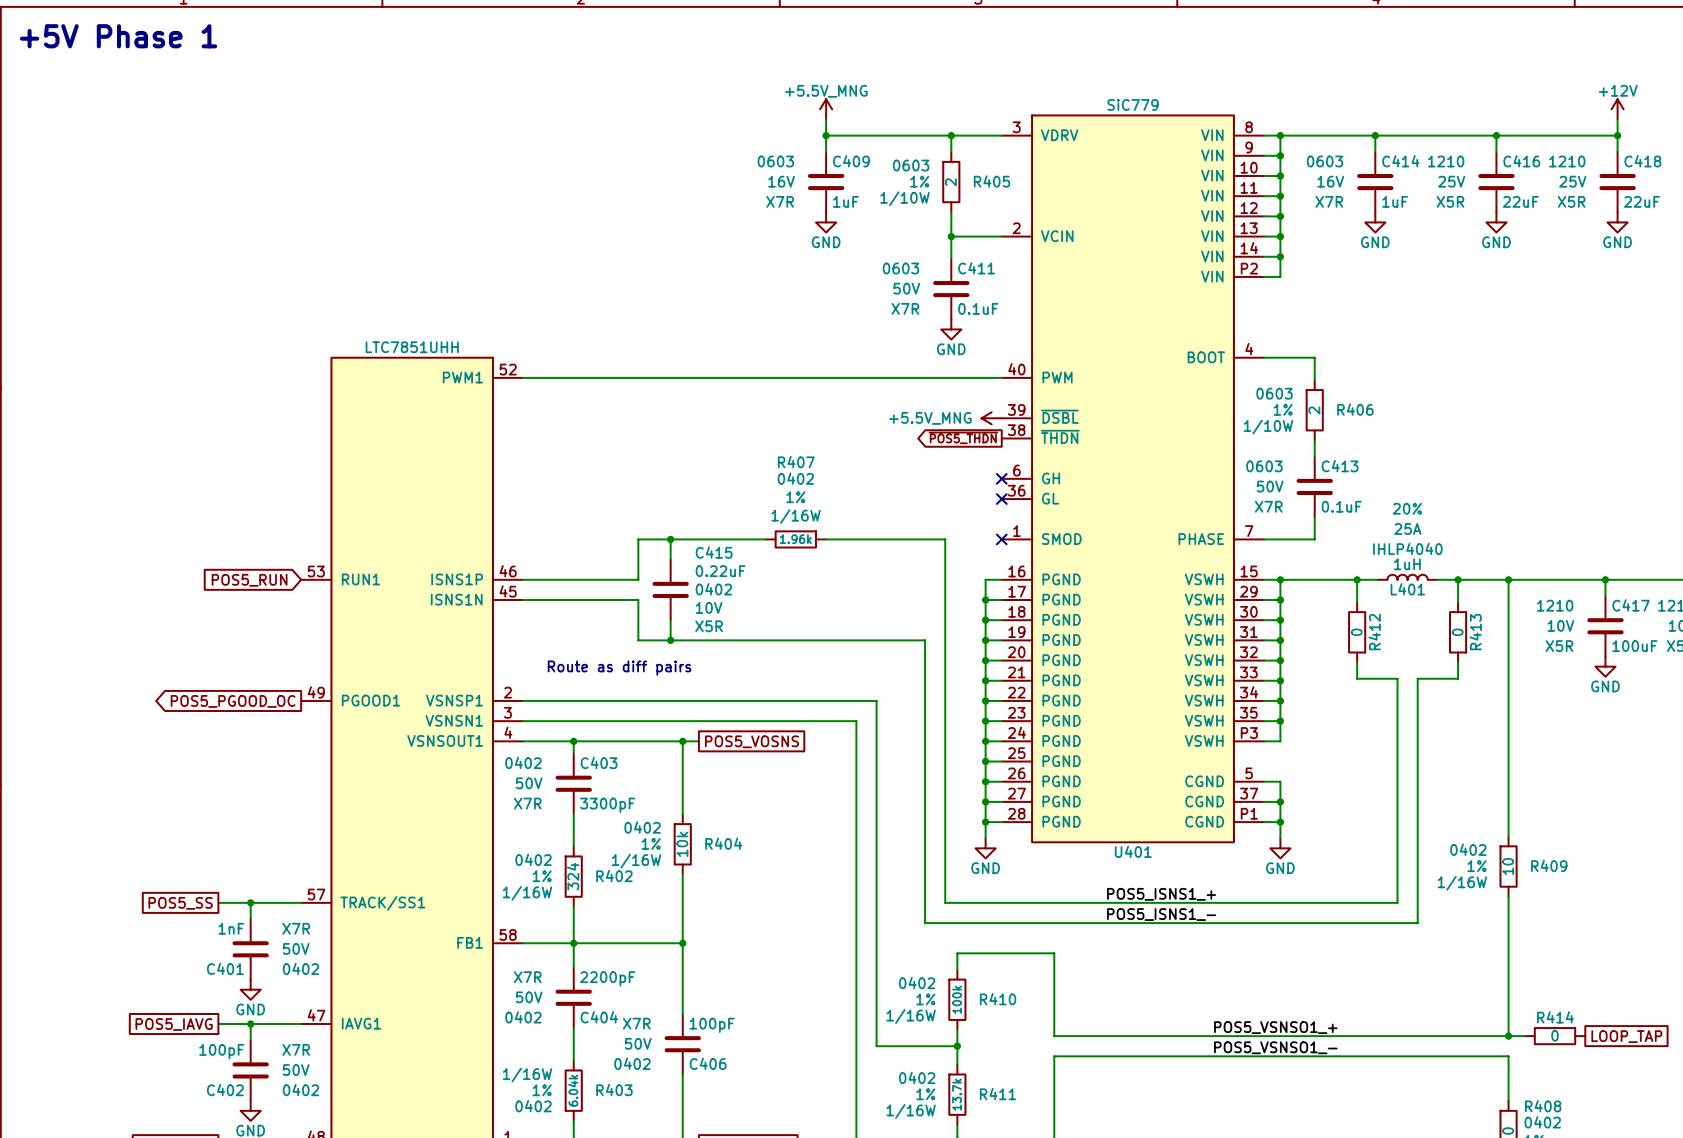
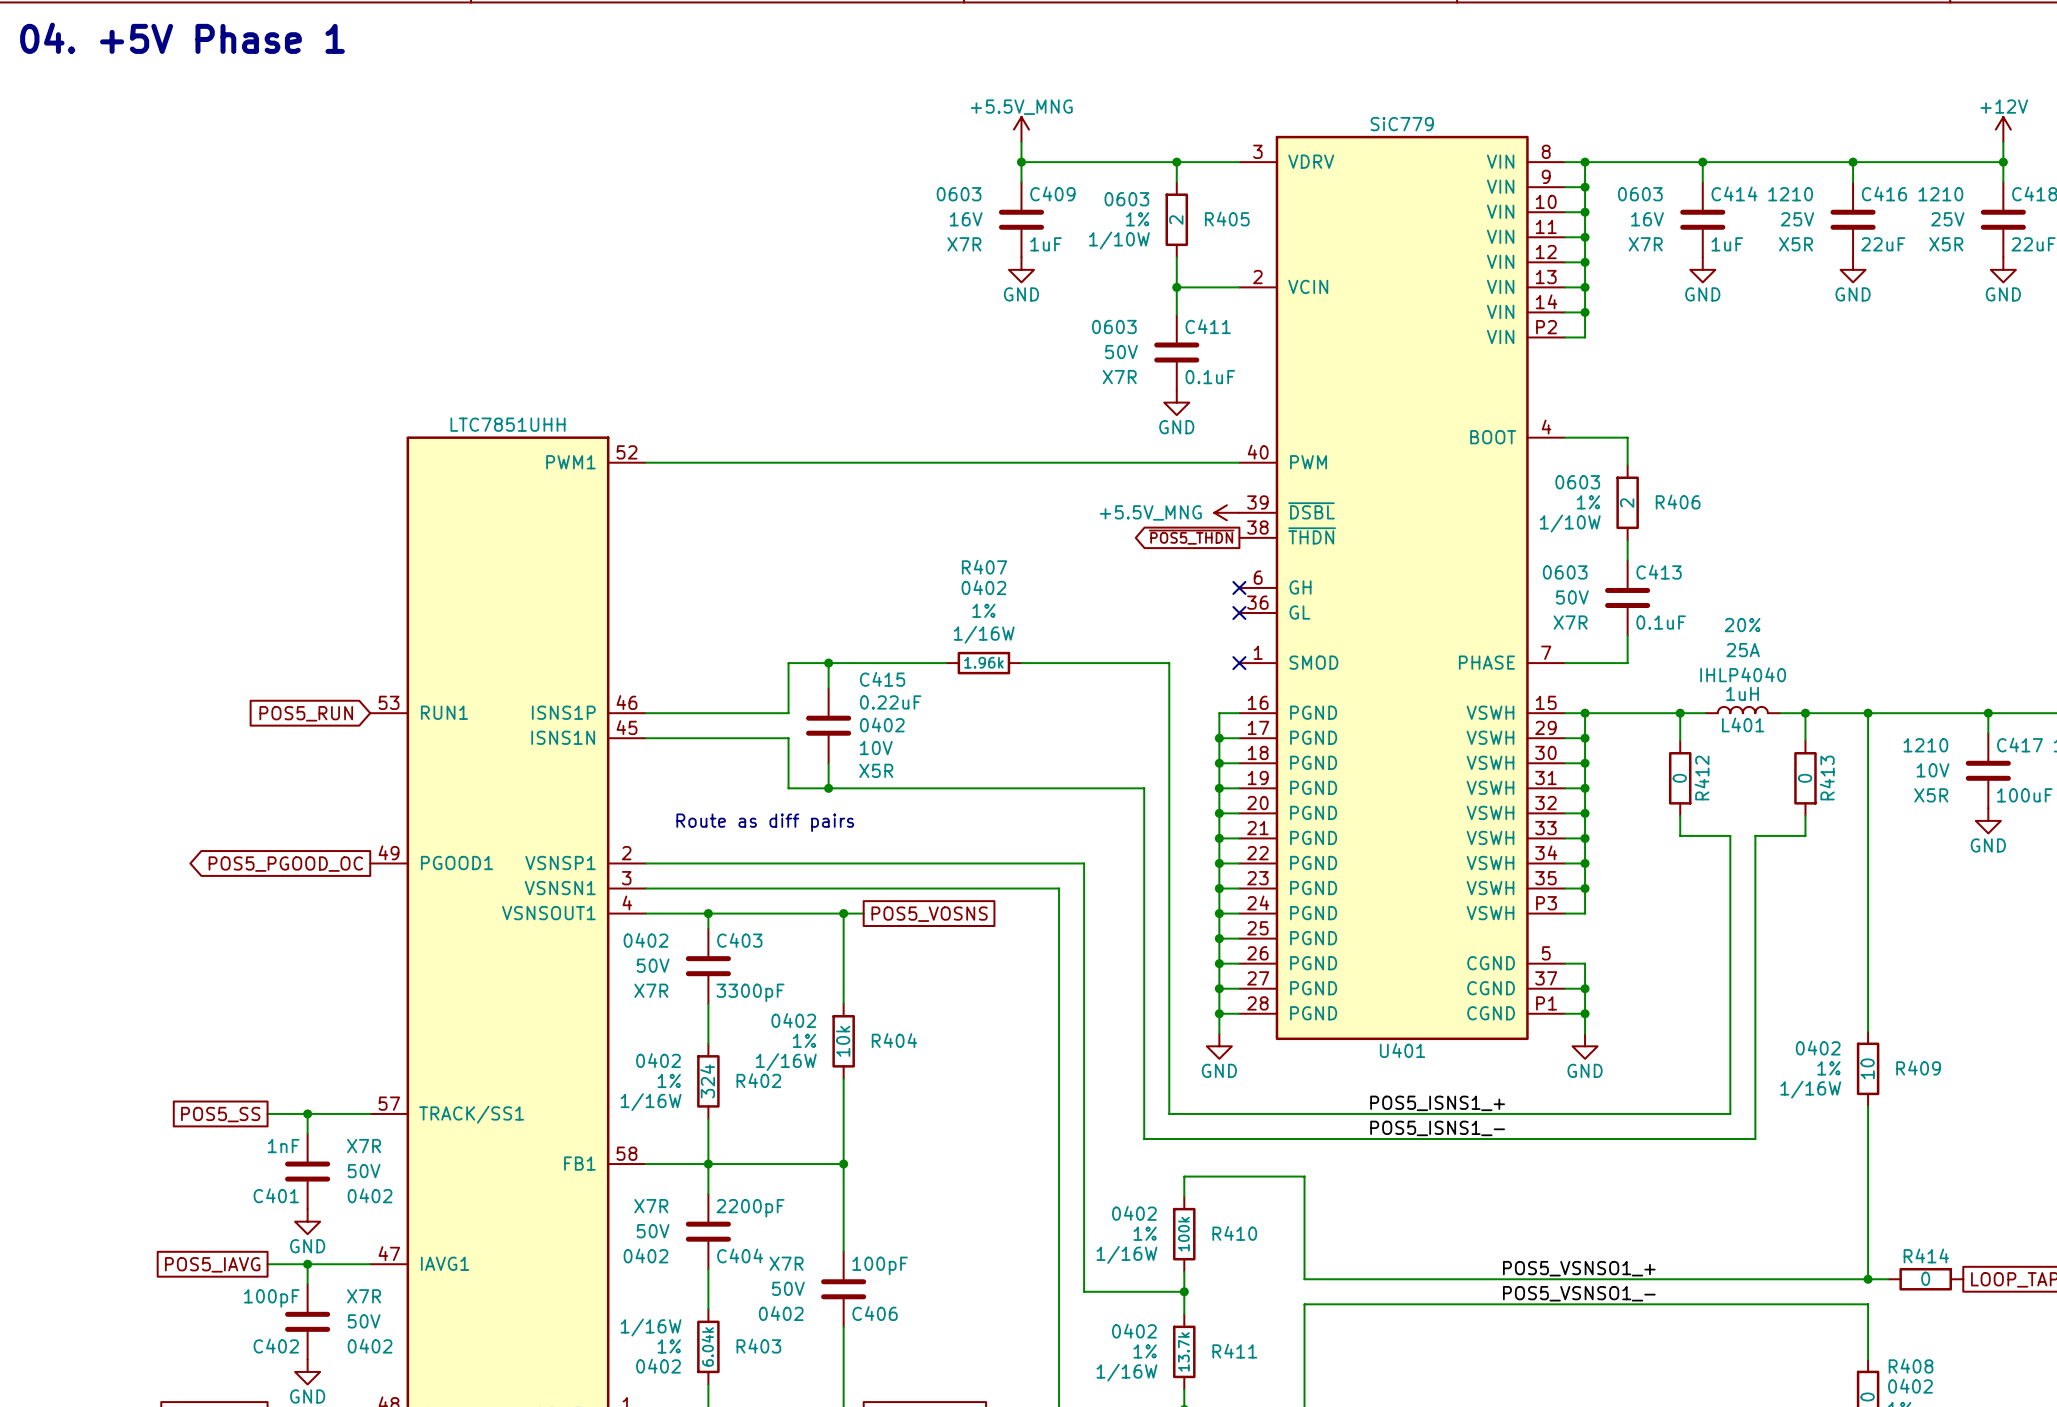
text: +5V Phase 1 (118, 36) -> 04. +5V Phase 1 (182, 38)

